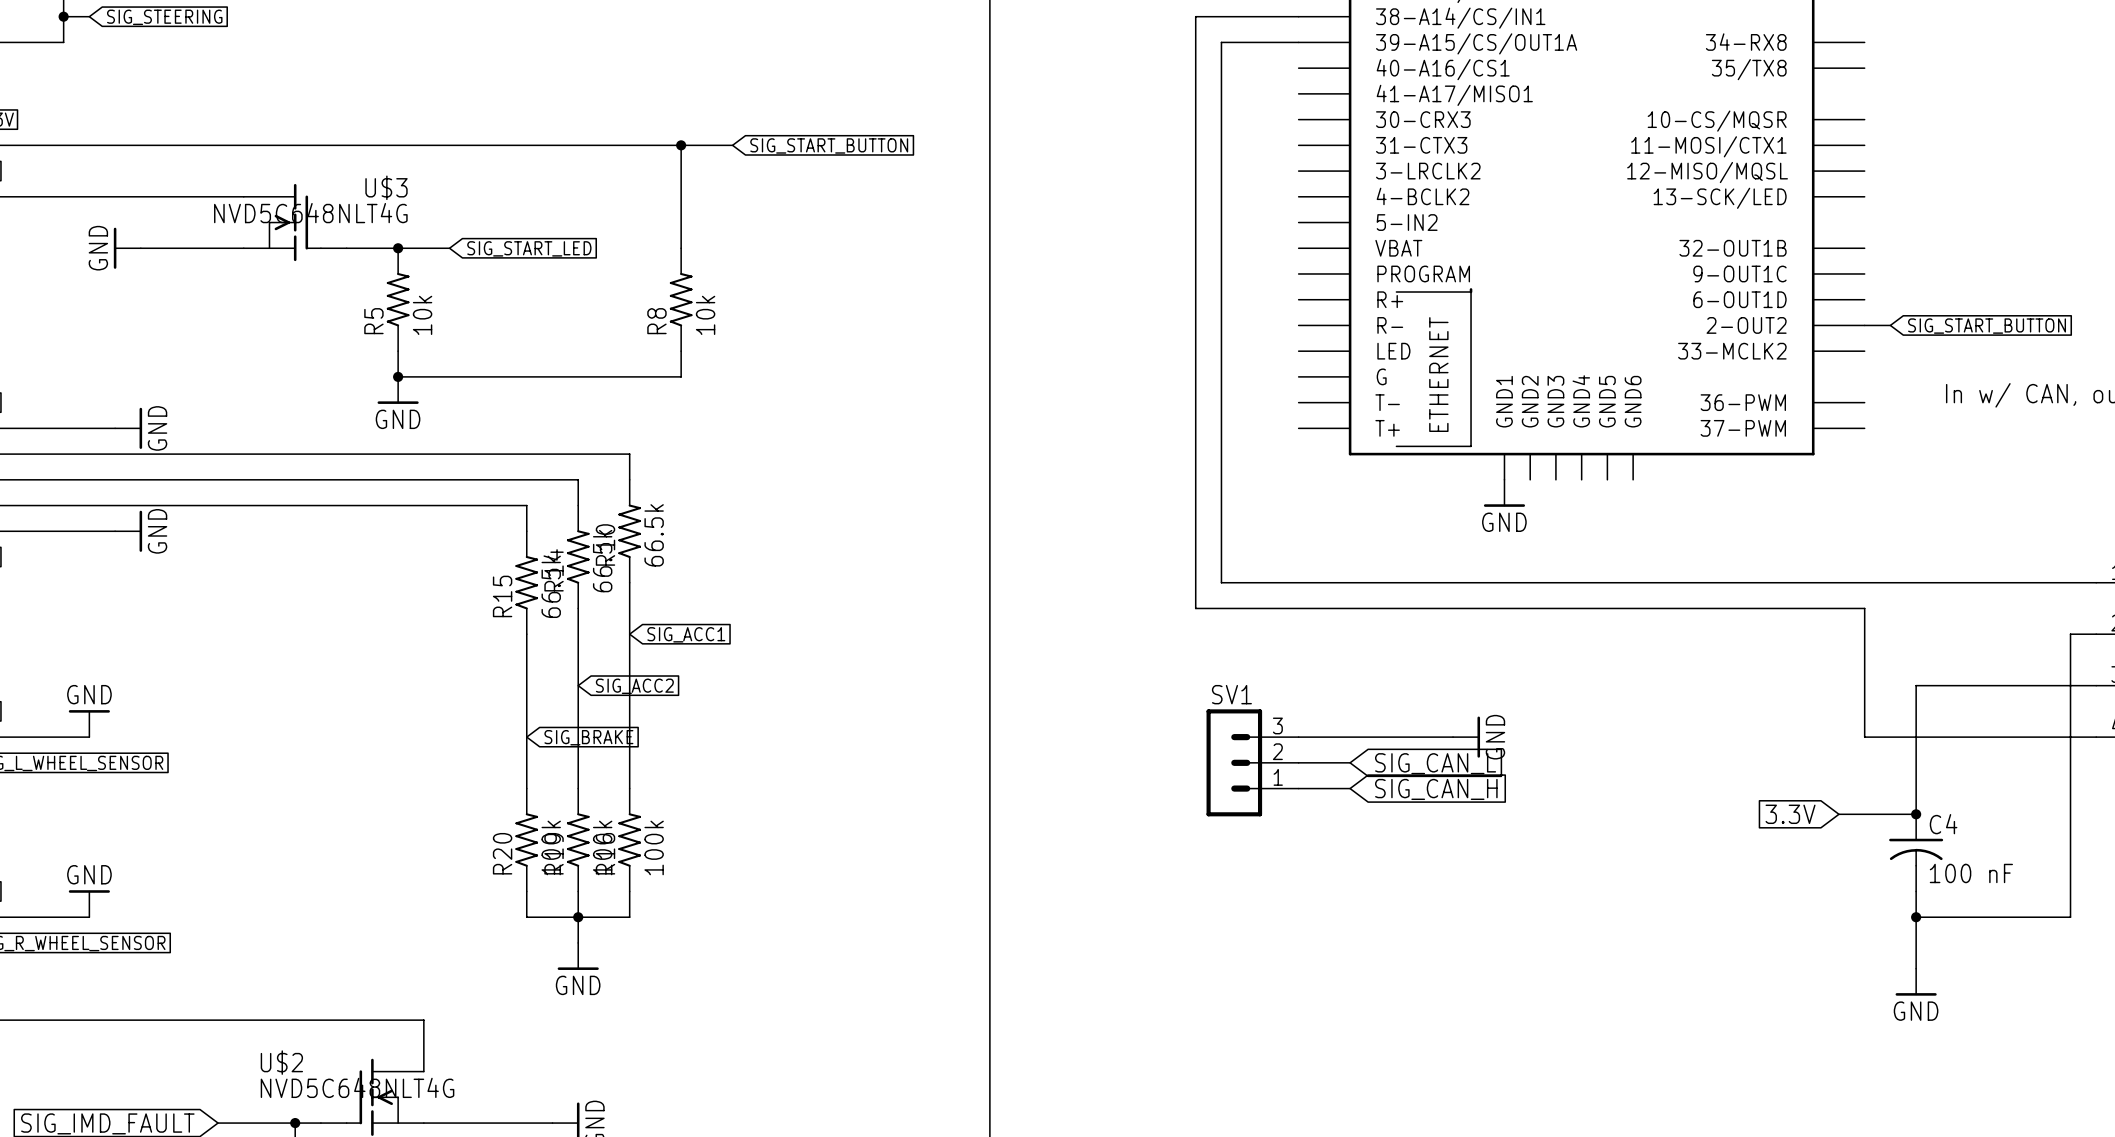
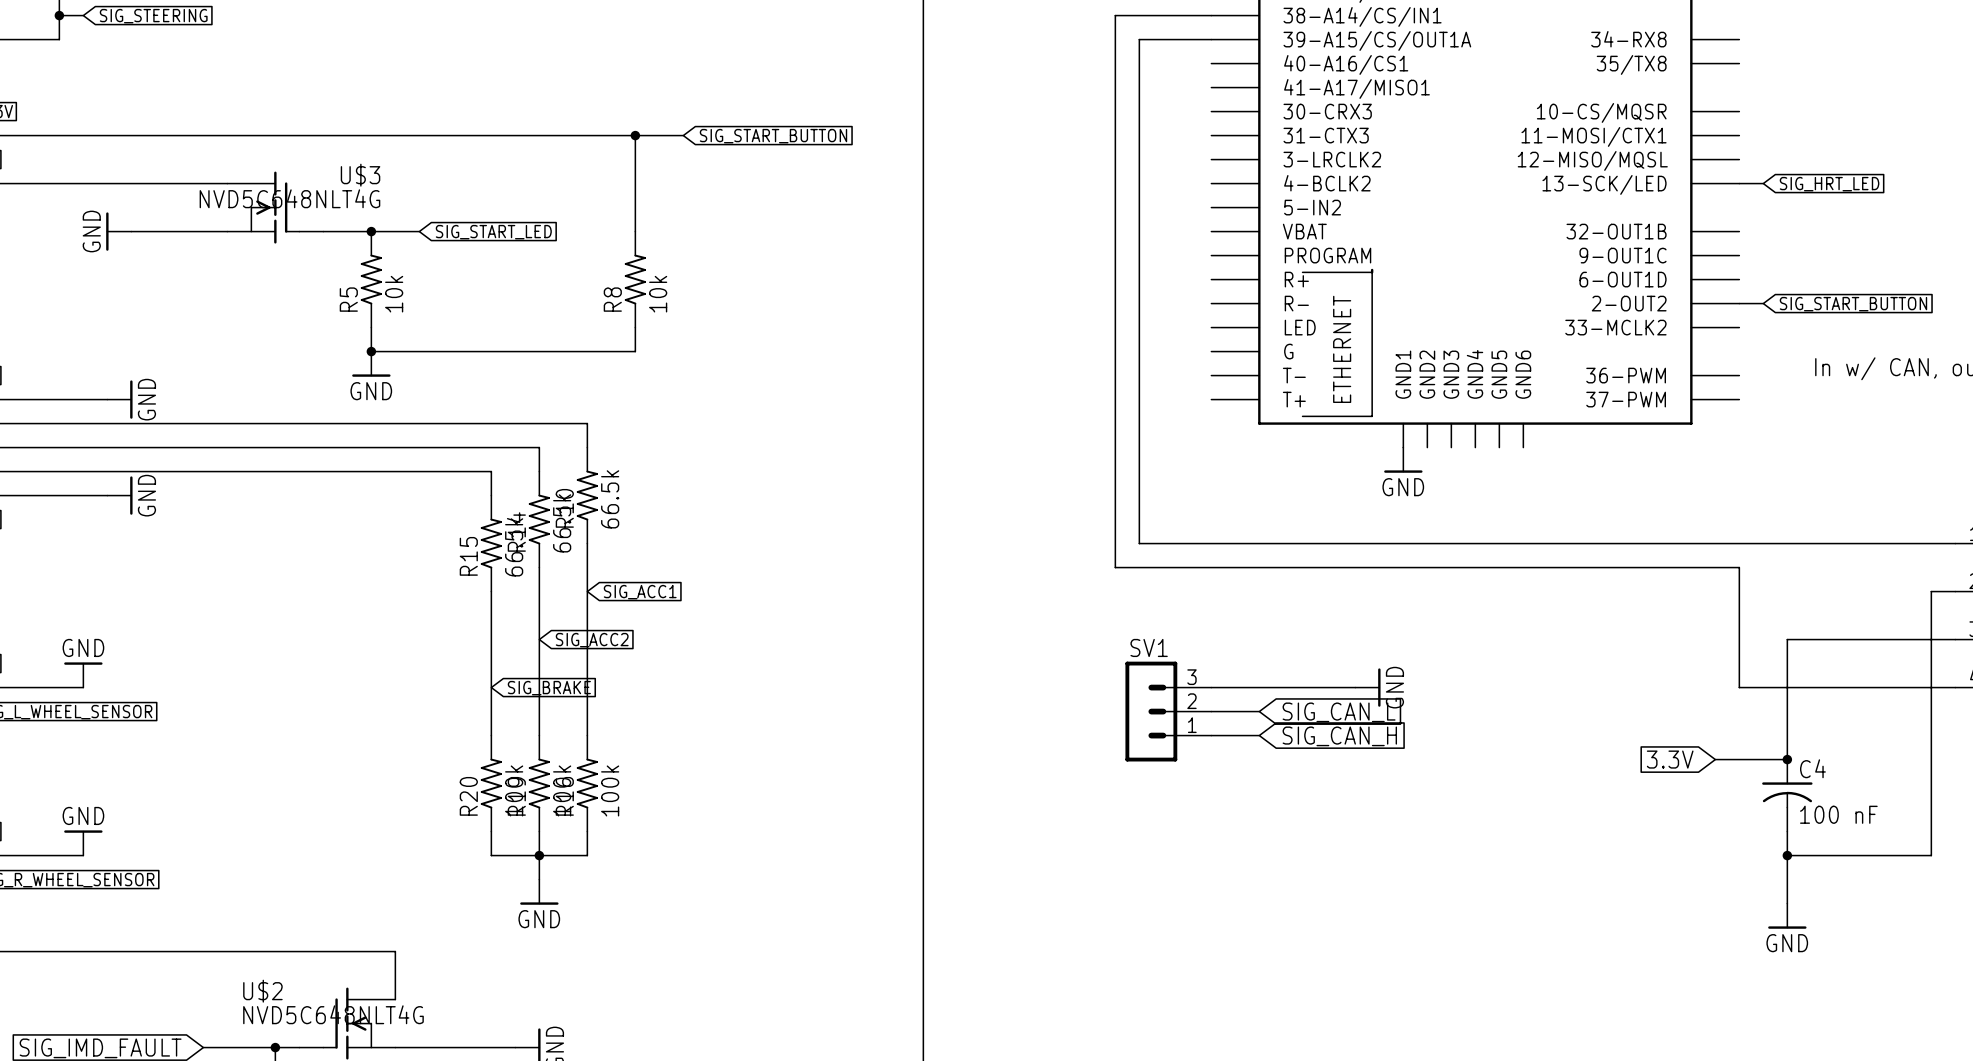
wire: none -> (1739, 183) (1763, 183)
global label: none -> SIG_HRT_LED (1829, 184)

